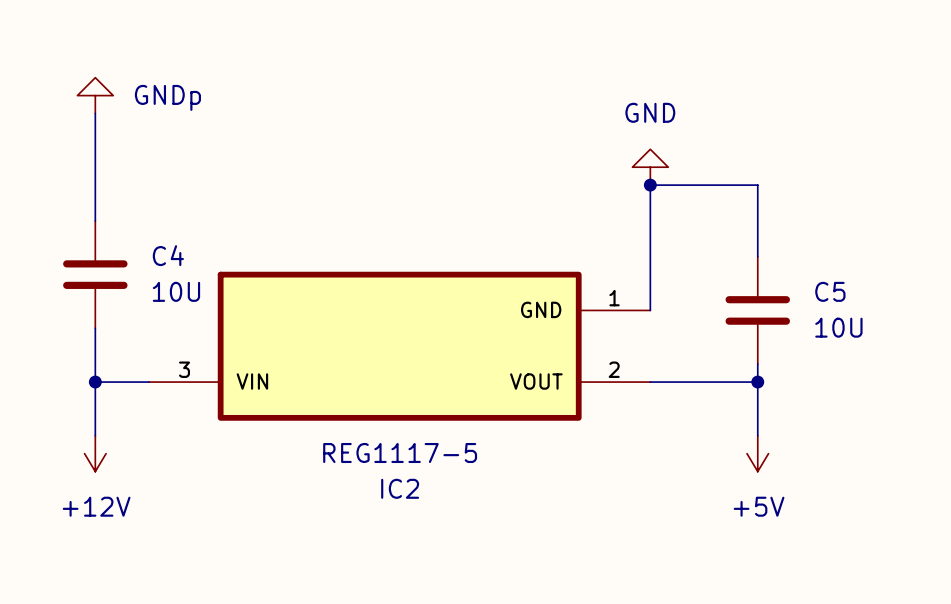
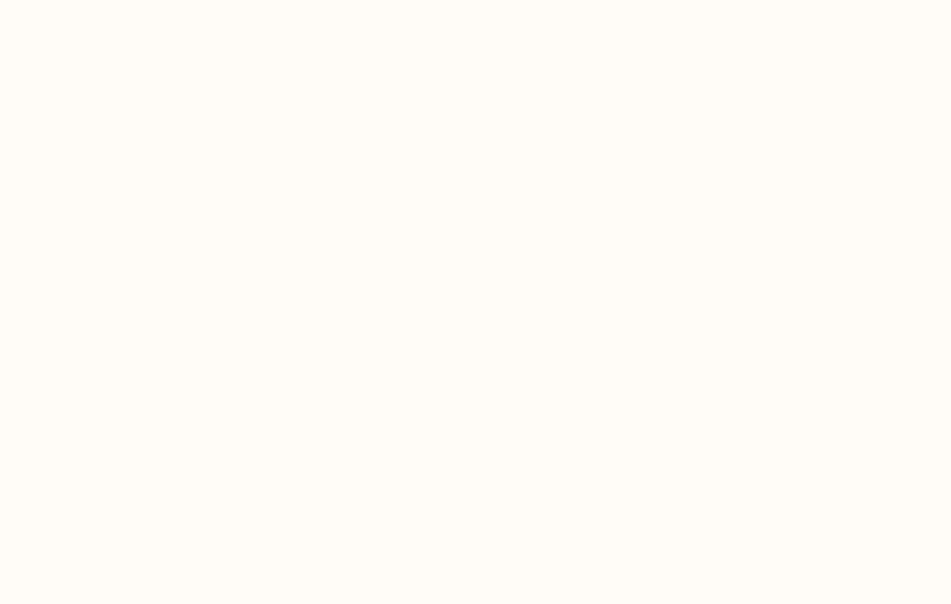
power symbol: GNDp (95, 95) -> none
wire: (95, 113) (95, 220) -> none
power symbol: GND (650, 167) -> none
junction: (650, 185) -> none
wire: (757, 256) (757, 185) (650, 185) (650, 310) -> none
C4: 10U (95, 274) -> none
C5: 10U (757, 310) -> none
wire: (95, 328) (95, 435) -> none
IC2: REG1117-5 (399, 346) -> none
wire: (757, 364) (757, 435) -> none
wire: (95, 382) (149, 382) -> none
junction: (95, 382) -> none
wire: (650, 382) (757, 382) -> none
junction: (757, 382) -> none
power symbol: +12V (95, 453) -> none
power symbol: +5V (757, 453) -> none

